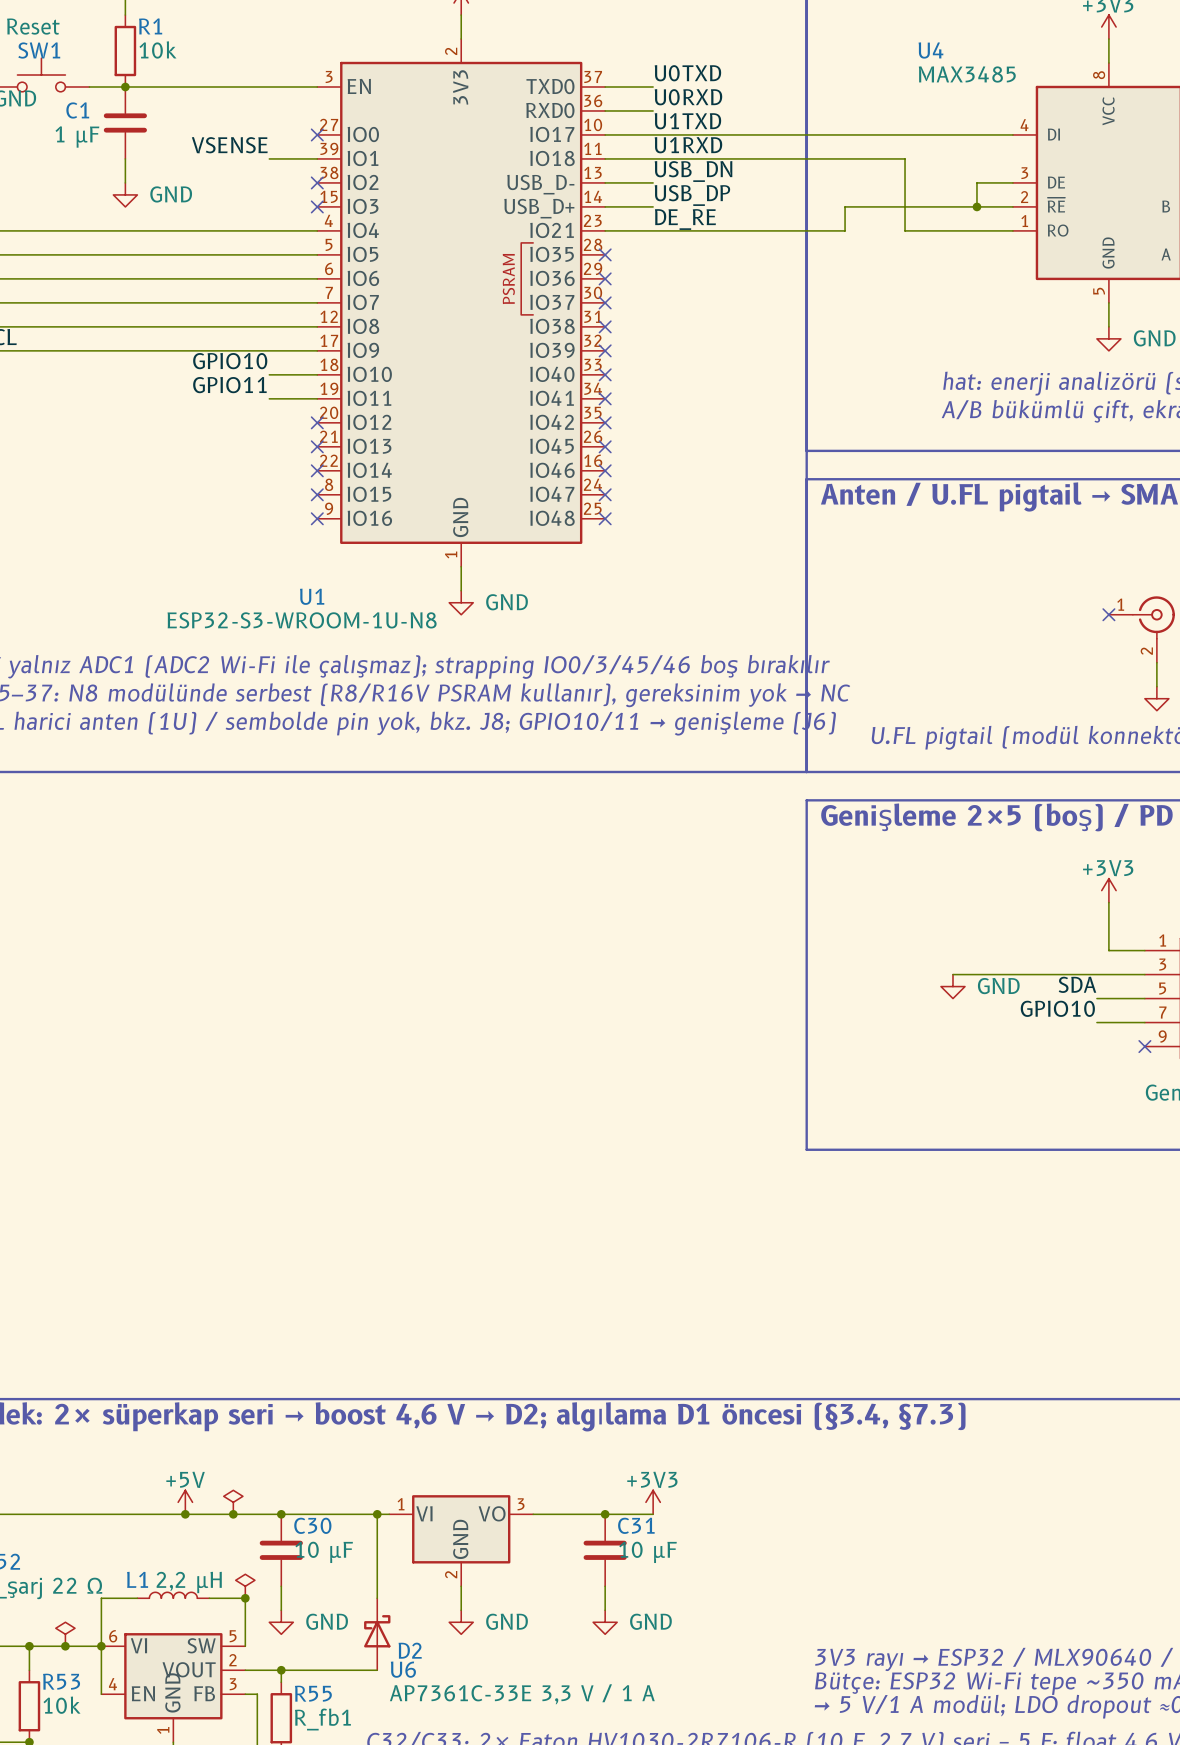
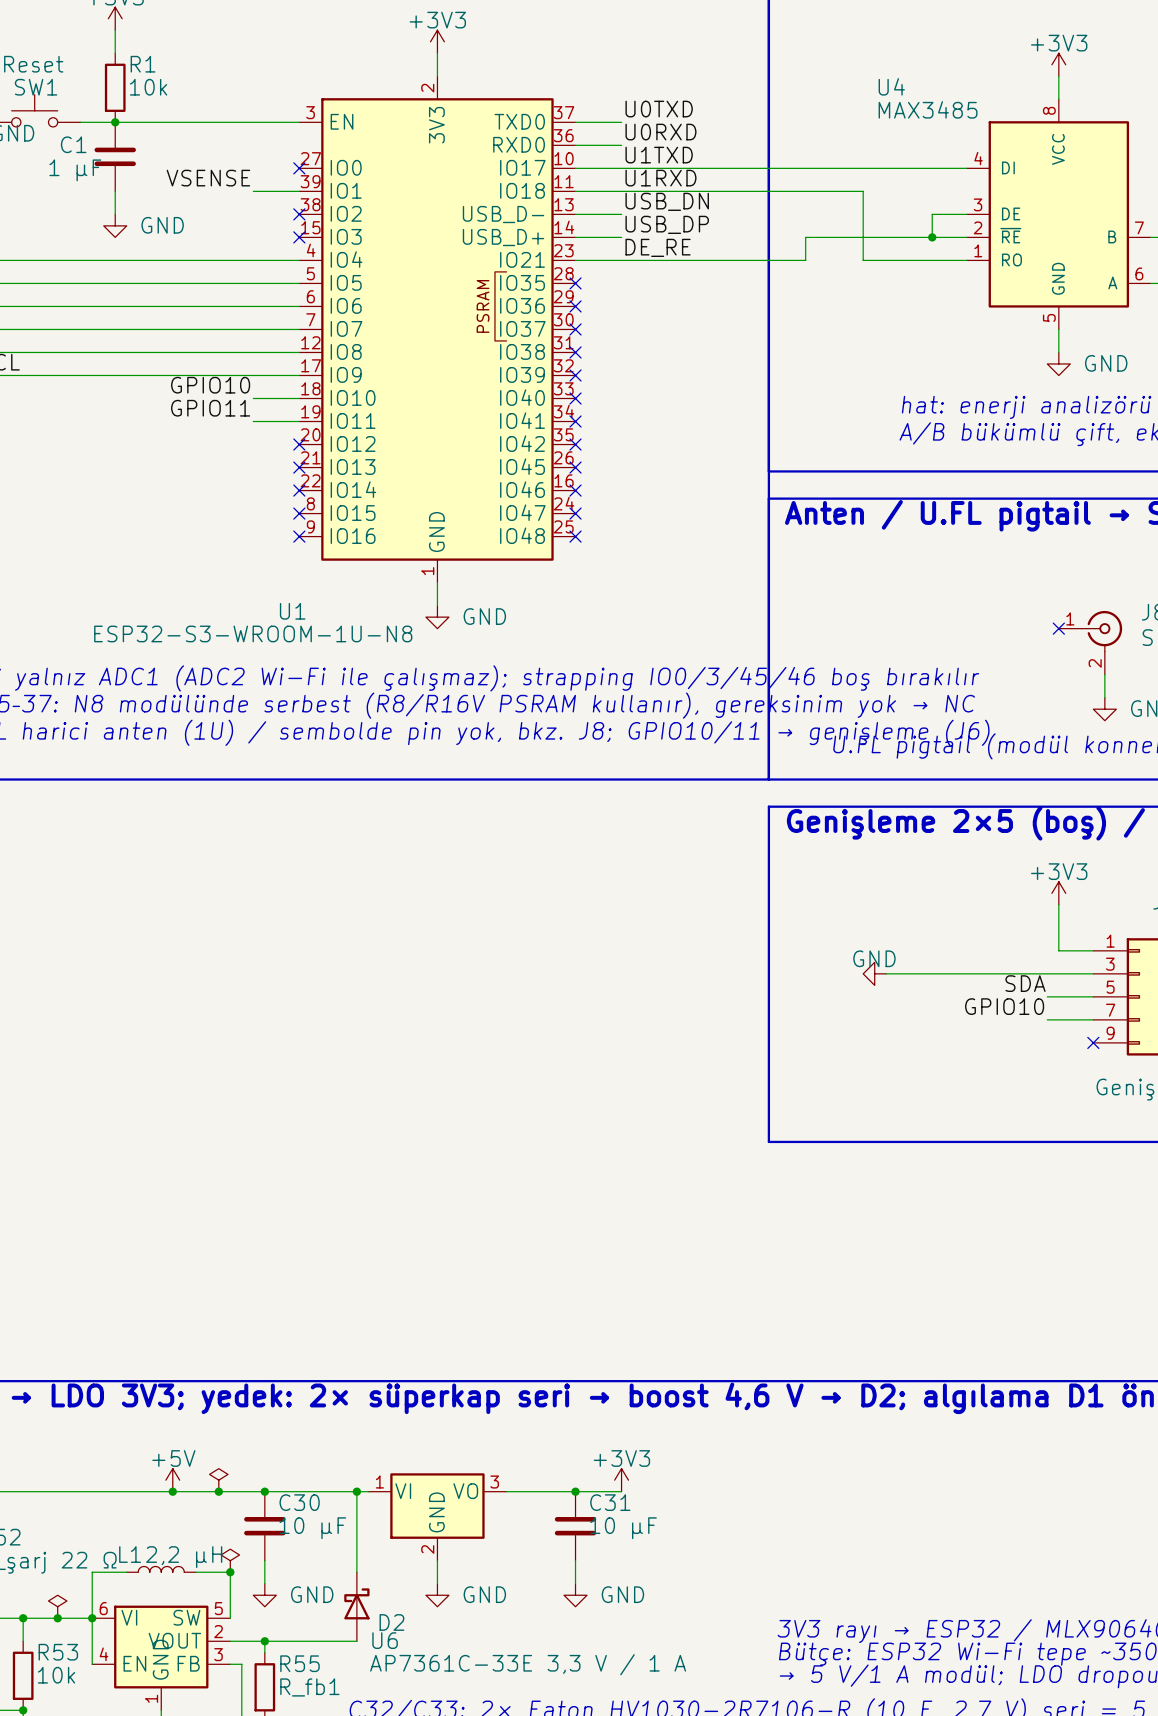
wire: none -> (886, 973) (909, 973)
power symbol rotation: 0° (952, 986) -> 90° clockwise (874, 973)
power symbol position: GND (952, 986) -> GND (874, 973)
power symbol text position: GND (998, 986) -> GND (874, 958)

